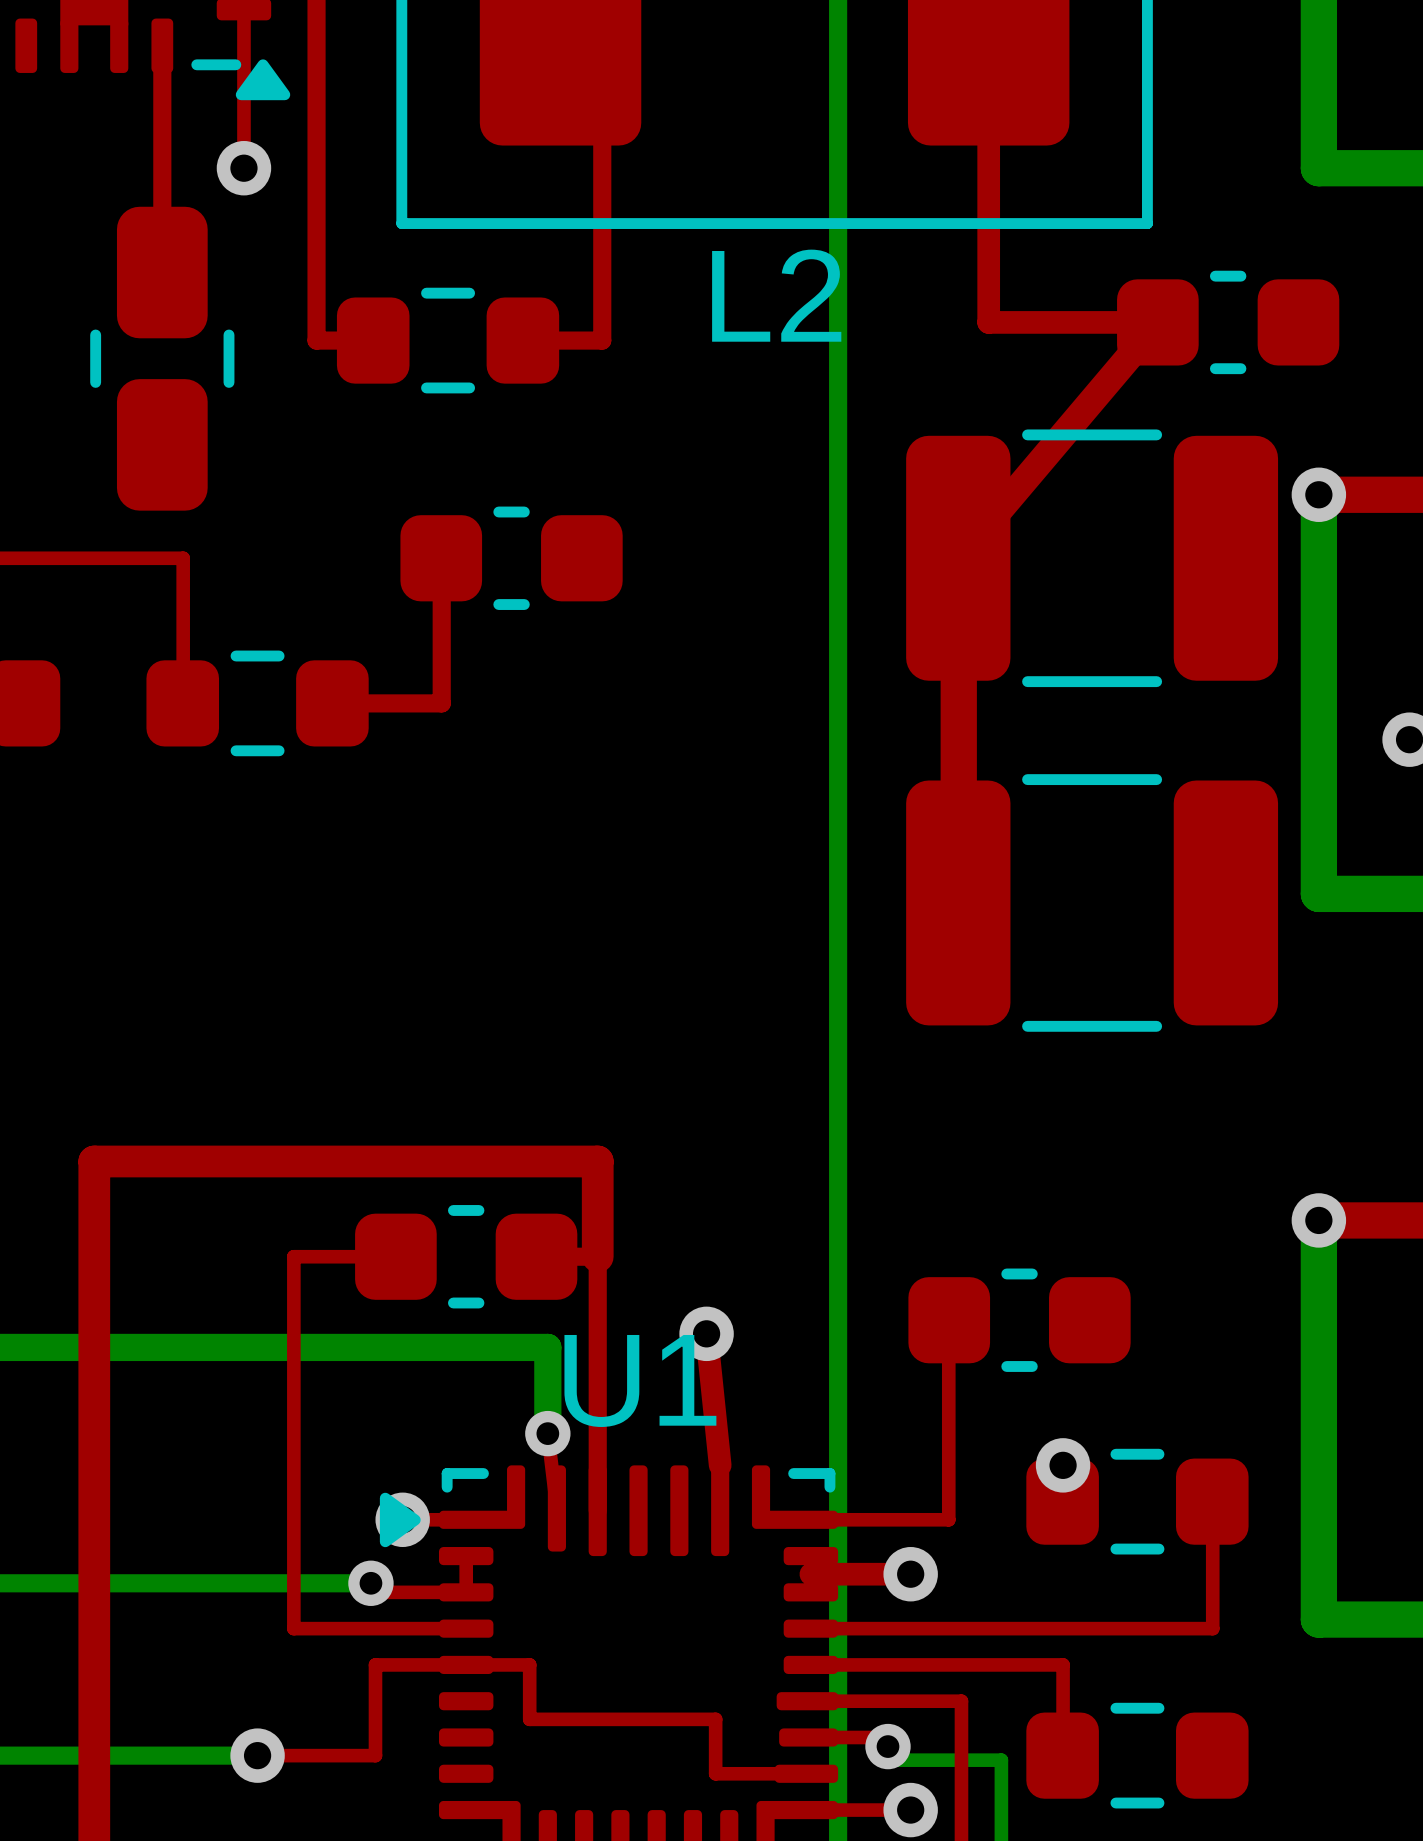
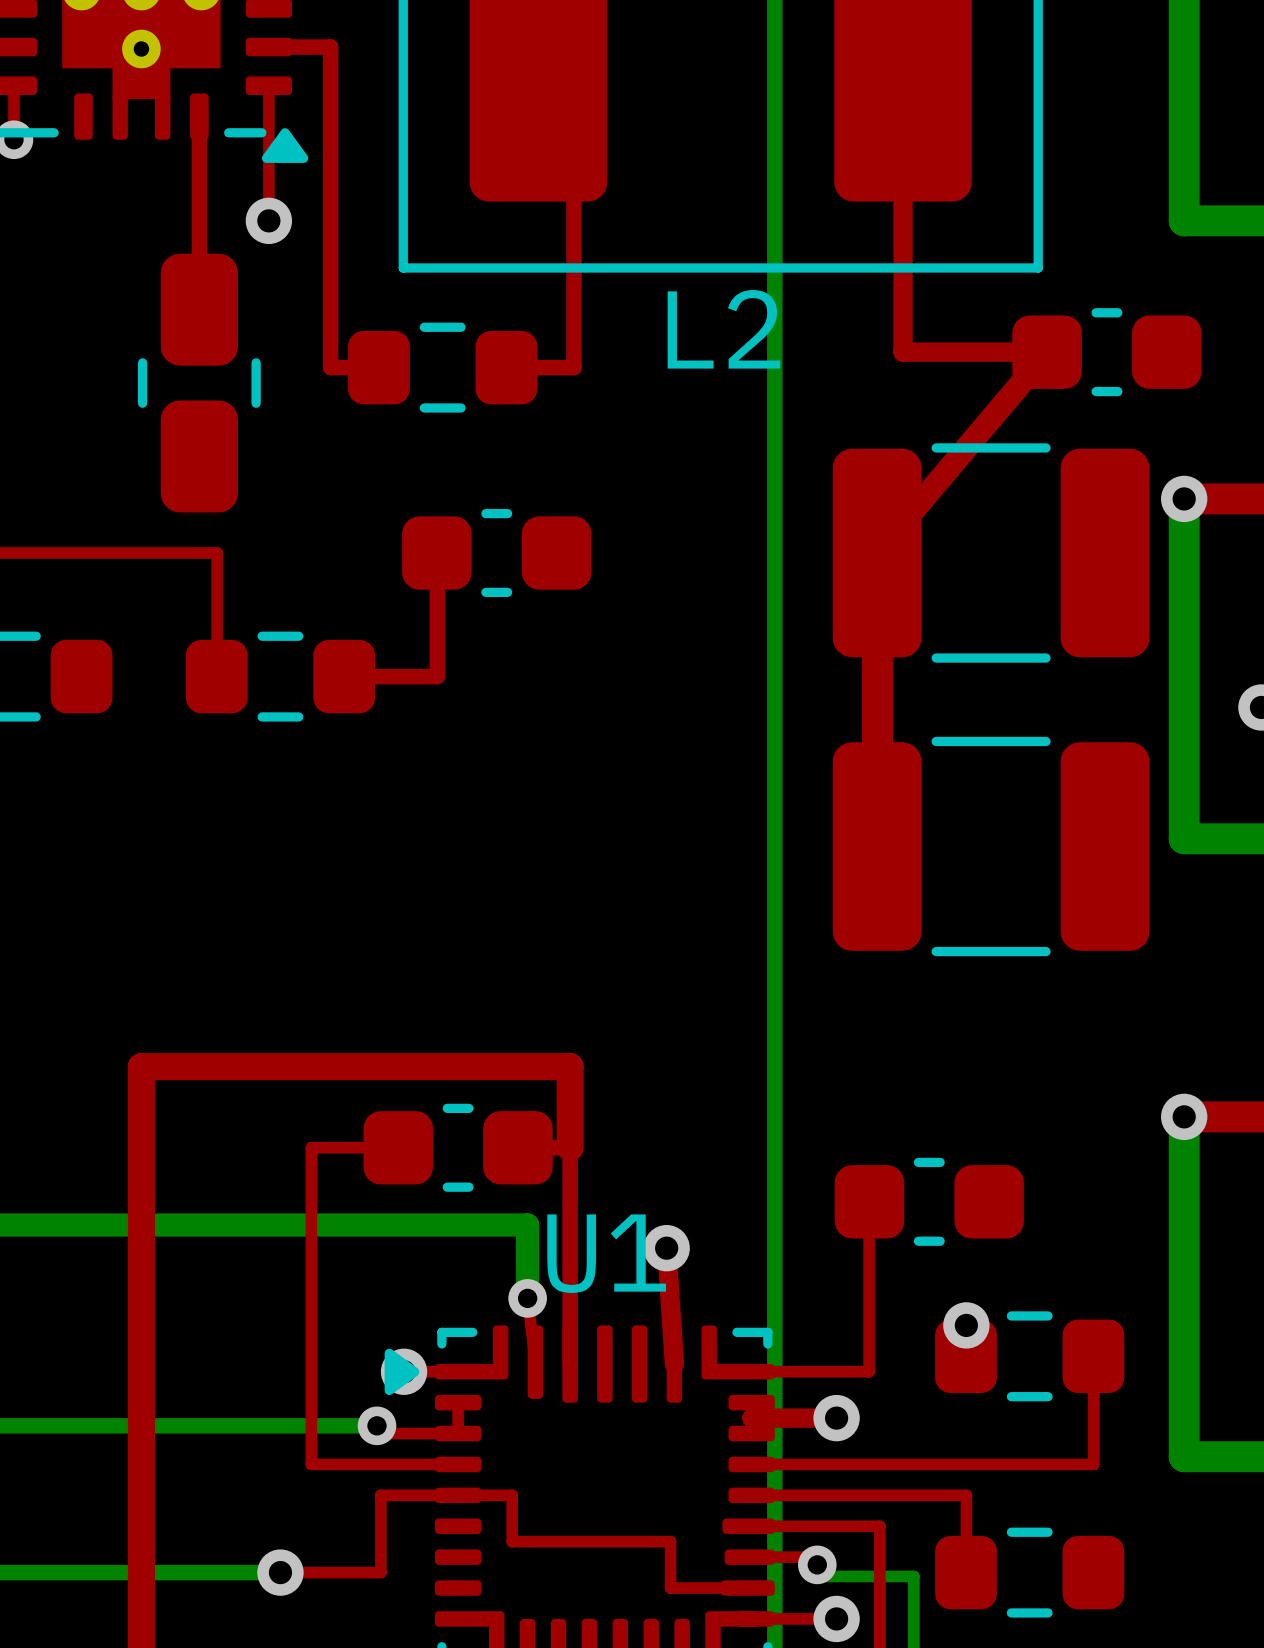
top track: (706, 1333) (720, 1465) -> none
via position: (706, 1333) -> (666, 1248)
top track: none -> (666, 1248) (674, 1364)

